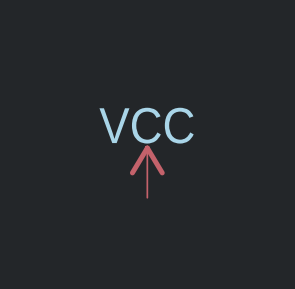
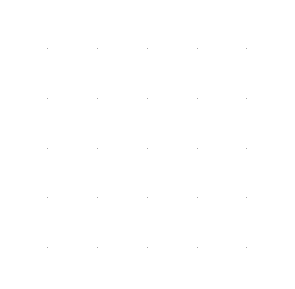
power symbol: VCC (147, 171) -> none

